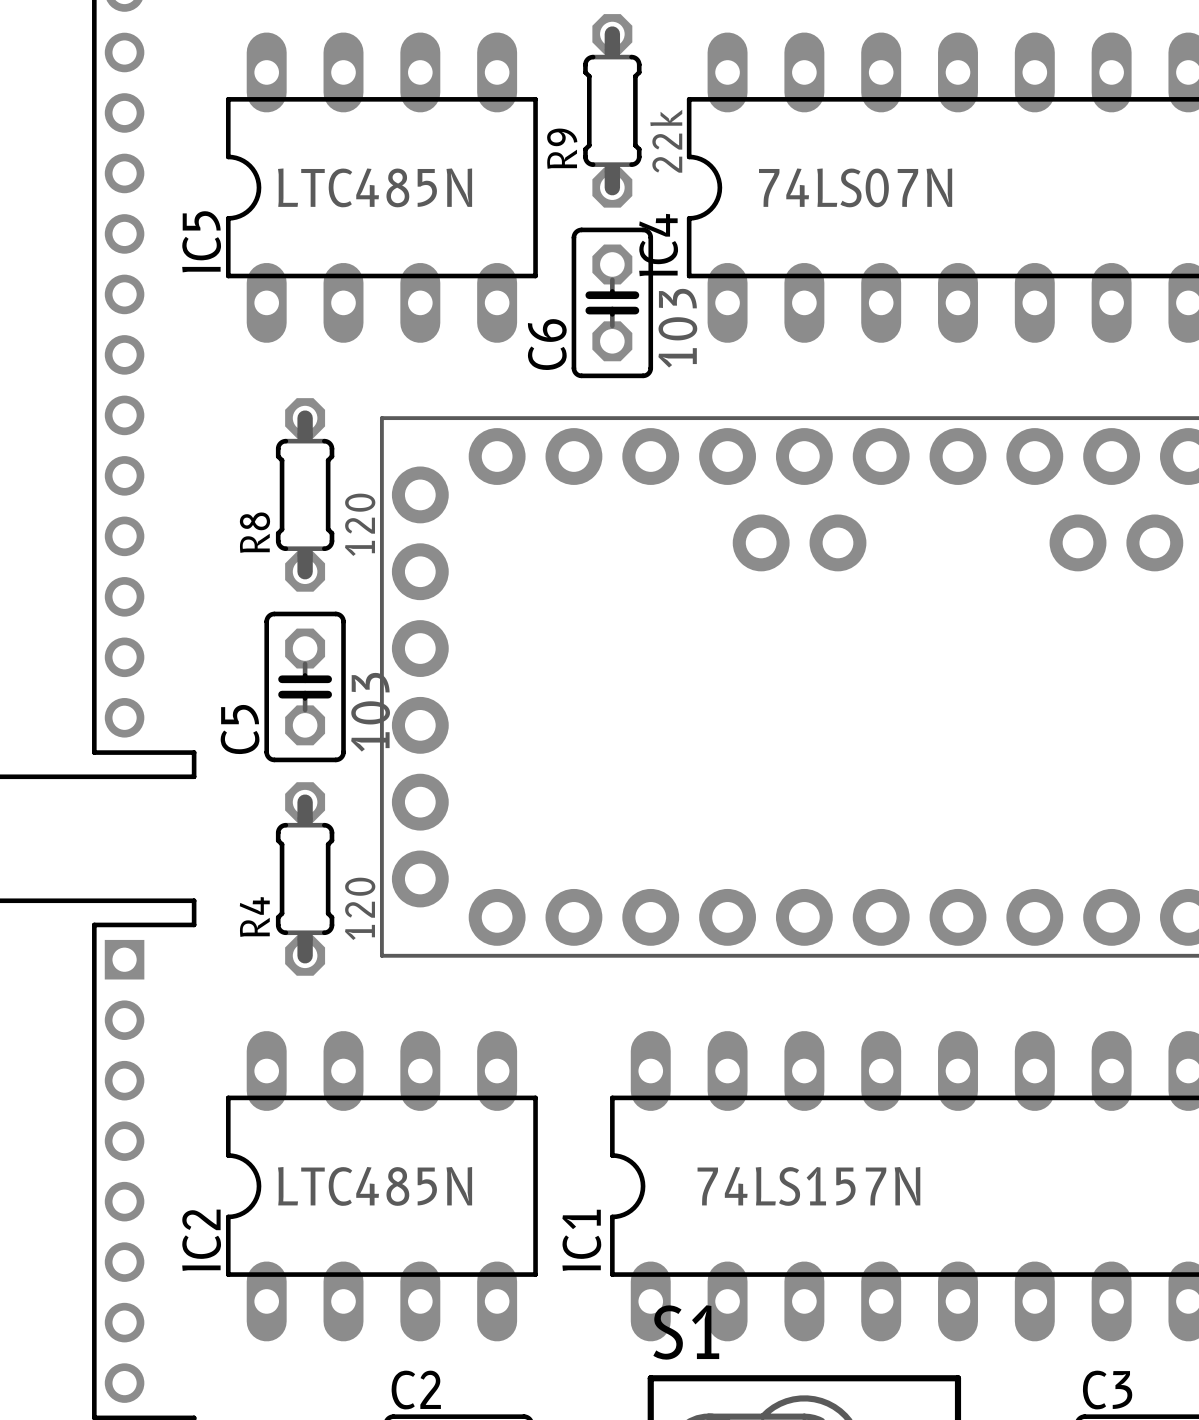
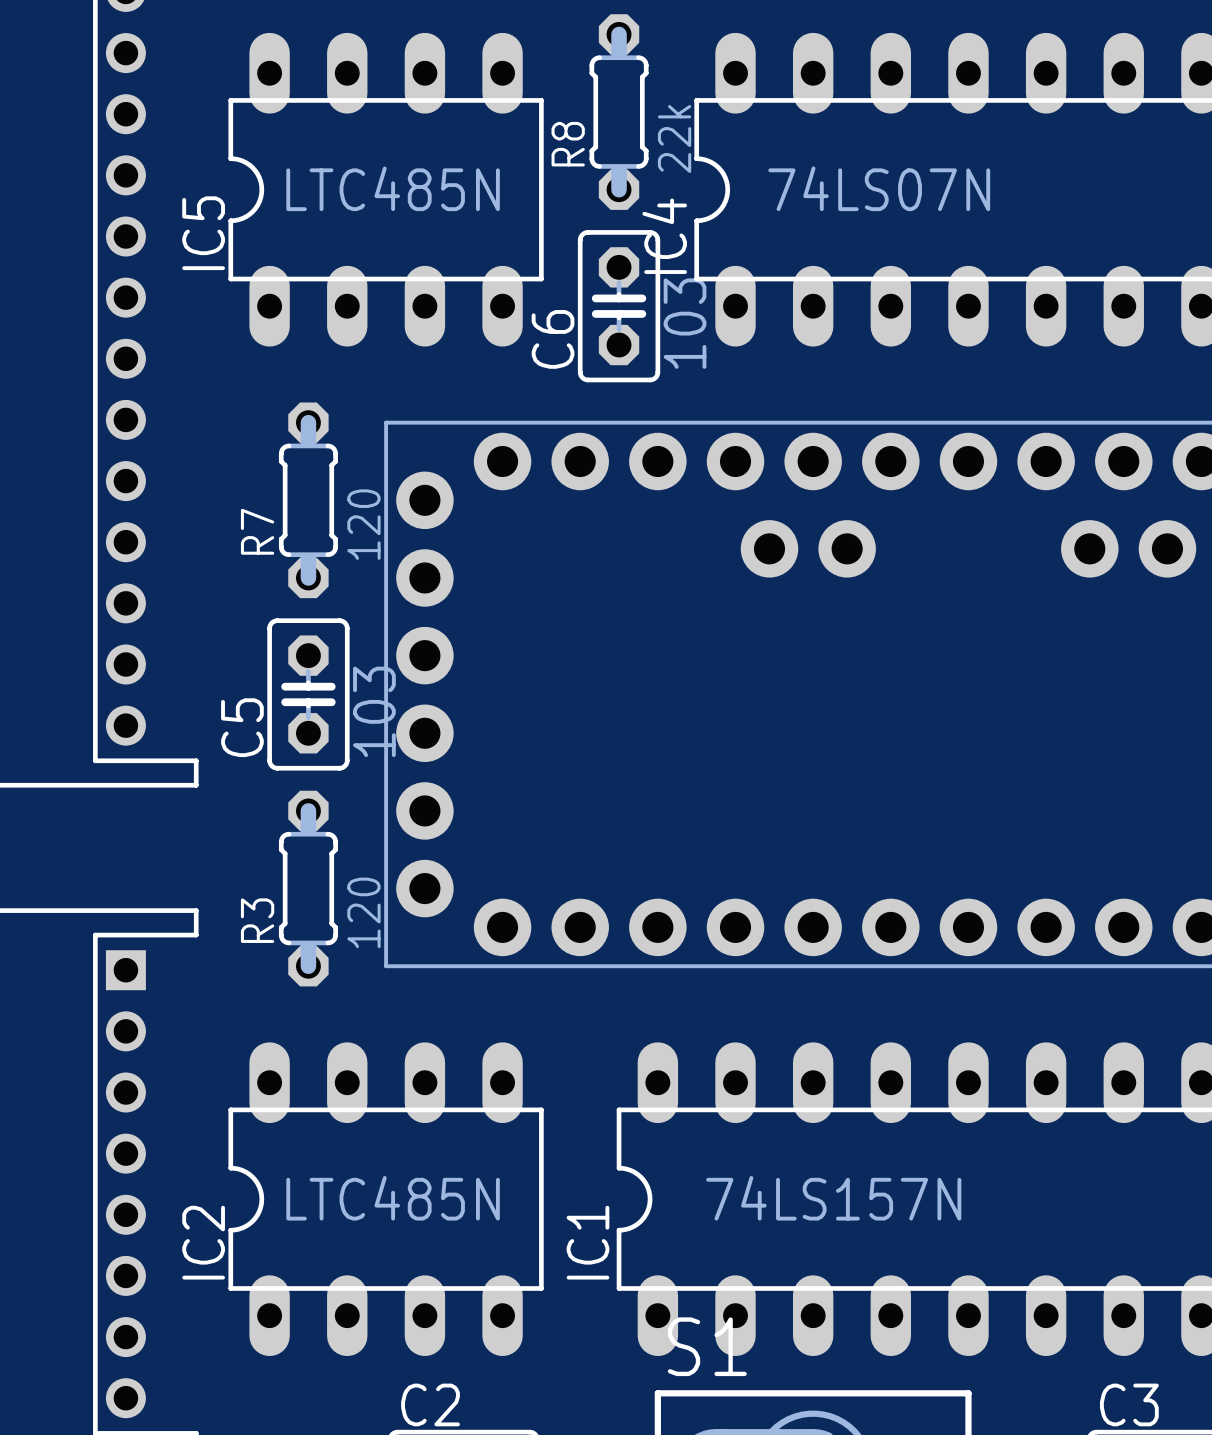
R9 name: R9 (562, 148) -> R8 (568, 144)
R8 name: R8 (254, 532) -> R7 (257, 531)
R4 name: R4 (254, 917) -> R3 (257, 920)

